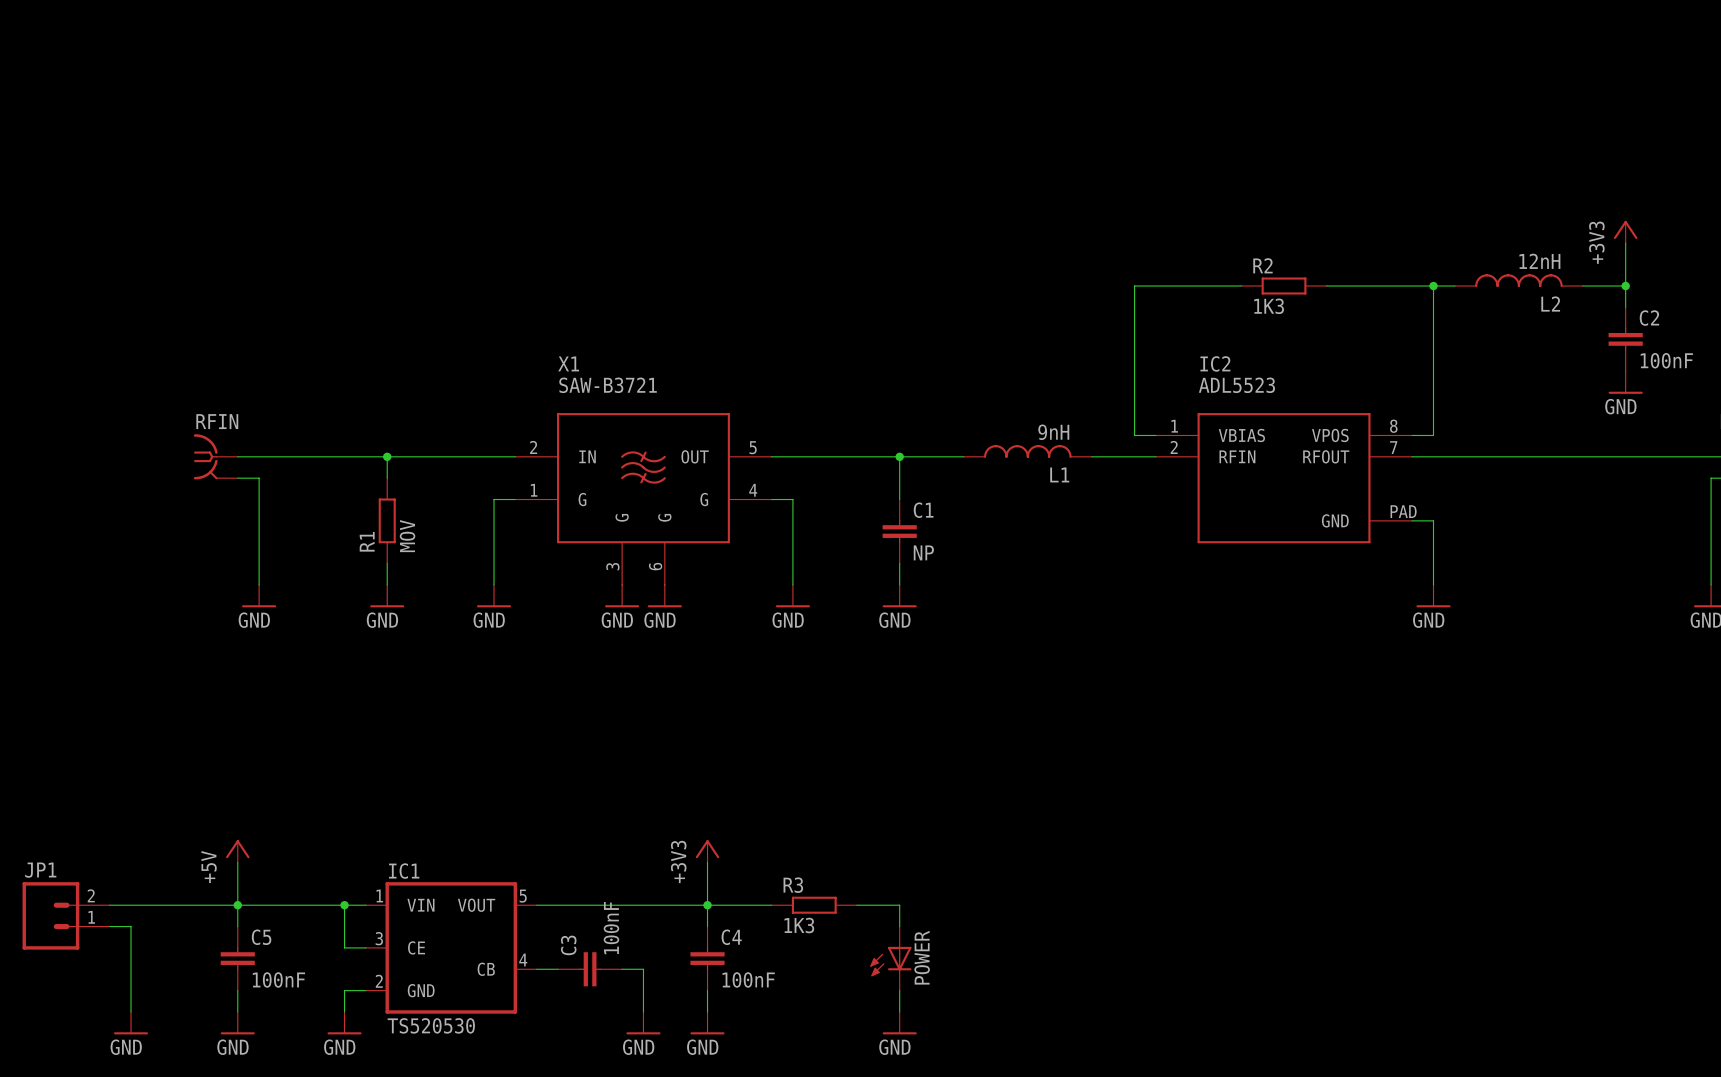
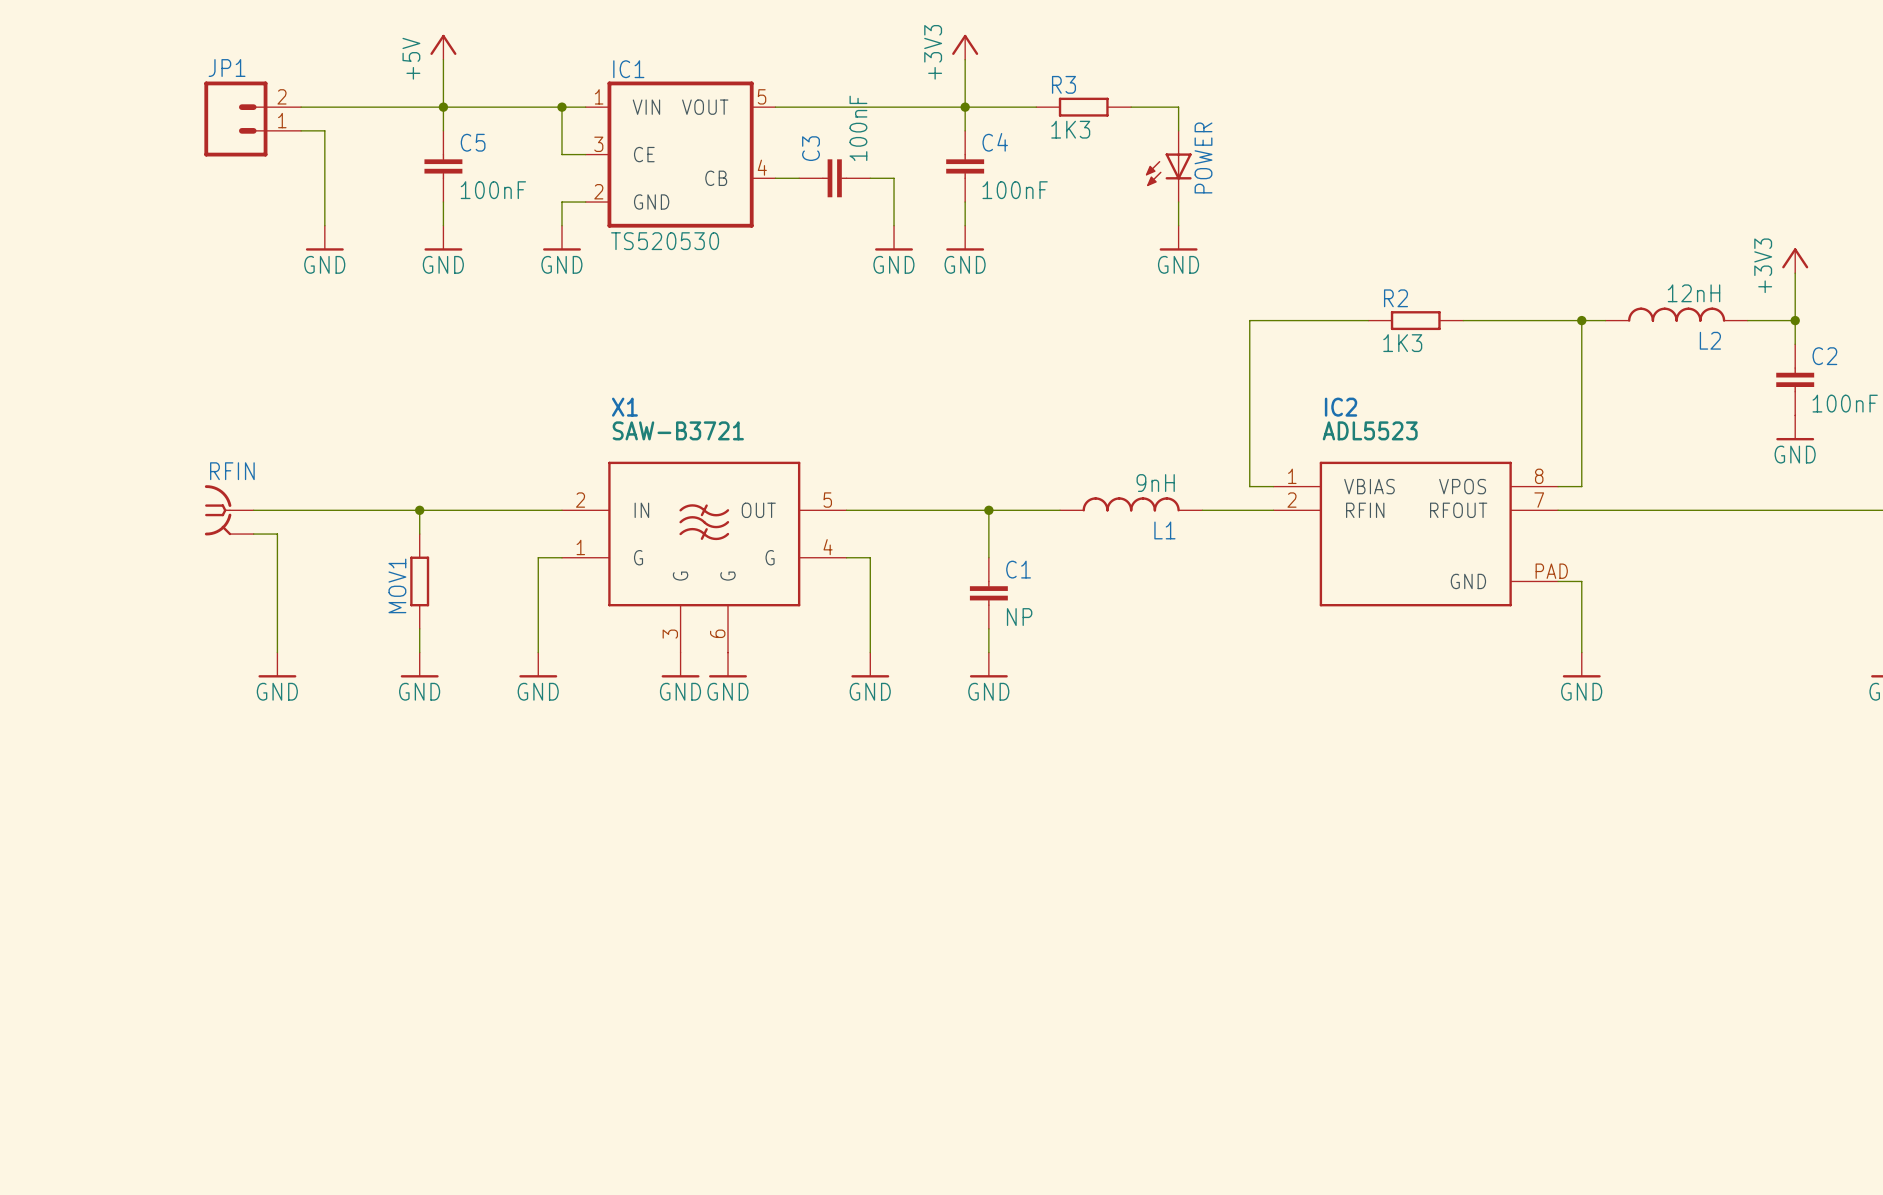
power symbol: none -> +5V (443, 47)
power symbol: none -> +3V3 (965, 47)
wire: none -> (443, 59) (443, 130)
wire: none -> (965, 59) (965, 130)
wire: none -> (301, 107) (585, 107)
junction: none -> (443, 107)
wire: none -> (561, 107) (561, 154) (585, 154)
junction: none -> (561, 107)
wire: none -> (775, 107) (1036, 107)
junction: none -> (965, 107)
wire: none -> (1131, 107) (1178, 107) (1178, 130)
wire: none -> (301, 130) (324, 130) (324, 225)
POWER: none -> (1168, 166)
wire: none -> (775, 178) (799, 178)
wire: none -> (870, 178) (894, 178) (894, 225)
wire: none -> (443, 202) (443, 225)
wire: none -> (585, 202) (561, 202) (561, 225)
wire: none -> (965, 202) (965, 225)
wire: none -> (1178, 202) (1178, 225)
power symbol: none -> GND (324, 238)
power symbol: none -> GND (443, 238)
power symbol: none -> GND (561, 238)
power symbol: none -> GND (894, 238)
power symbol: none -> GND (965, 238)
power symbol: none -> GND (1178, 238)
R1 value: MOV (407, 536) -> none
R1 name: R1 (367, 541) -> MOV1 (397, 585)
power symbol: +5V (237, 851) -> none
power symbol: +3V3 (707, 851) -> none
wire: (237, 862) (237, 926) -> none
wire: (707, 862) (707, 926) -> none
wire: (109, 905) (365, 905) -> none
junction: (237, 905) -> none
wire: (344, 905) (344, 947) (365, 947) -> none
junction: (344, 905) -> none
wire: (536, 905) (771, 905) -> none
junction: (707, 905) -> none
R3 position: (814, 905) -> (1083, 107)
wire: (856, 905) (899, 905) (899, 926) -> none
JP1 position: (66, 915) -> (252, 119)
wire: (109, 926) (131, 926) (131, 1011) -> none
IC1 position: (451, 947) -> (680, 154)
C5 position: (237, 958) -> (443, 166)
C4 position: (707, 958) -> (965, 166)
POWER: (890, 958) -> none
wire: (536, 969) (558, 969) -> none
C3 position: (590, 969) -> (834, 178)
wire: (622, 969) (643, 969) (643, 1011) -> none
wire: (237, 990) (237, 1011) -> none
wire: (365, 990) (344, 990) (344, 1011) -> none
wire: (707, 990) (707, 1011) -> none
wire: (899, 990) (899, 1011) -> none
power symbol: GND (131, 1023) -> none
power symbol: GND (237, 1023) -> none
power symbol: GND (344, 1023) -> none
power symbol: GND (643, 1023) -> none
power symbol: GND (707, 1023) -> none
power symbol: GND (899, 1023) -> none

